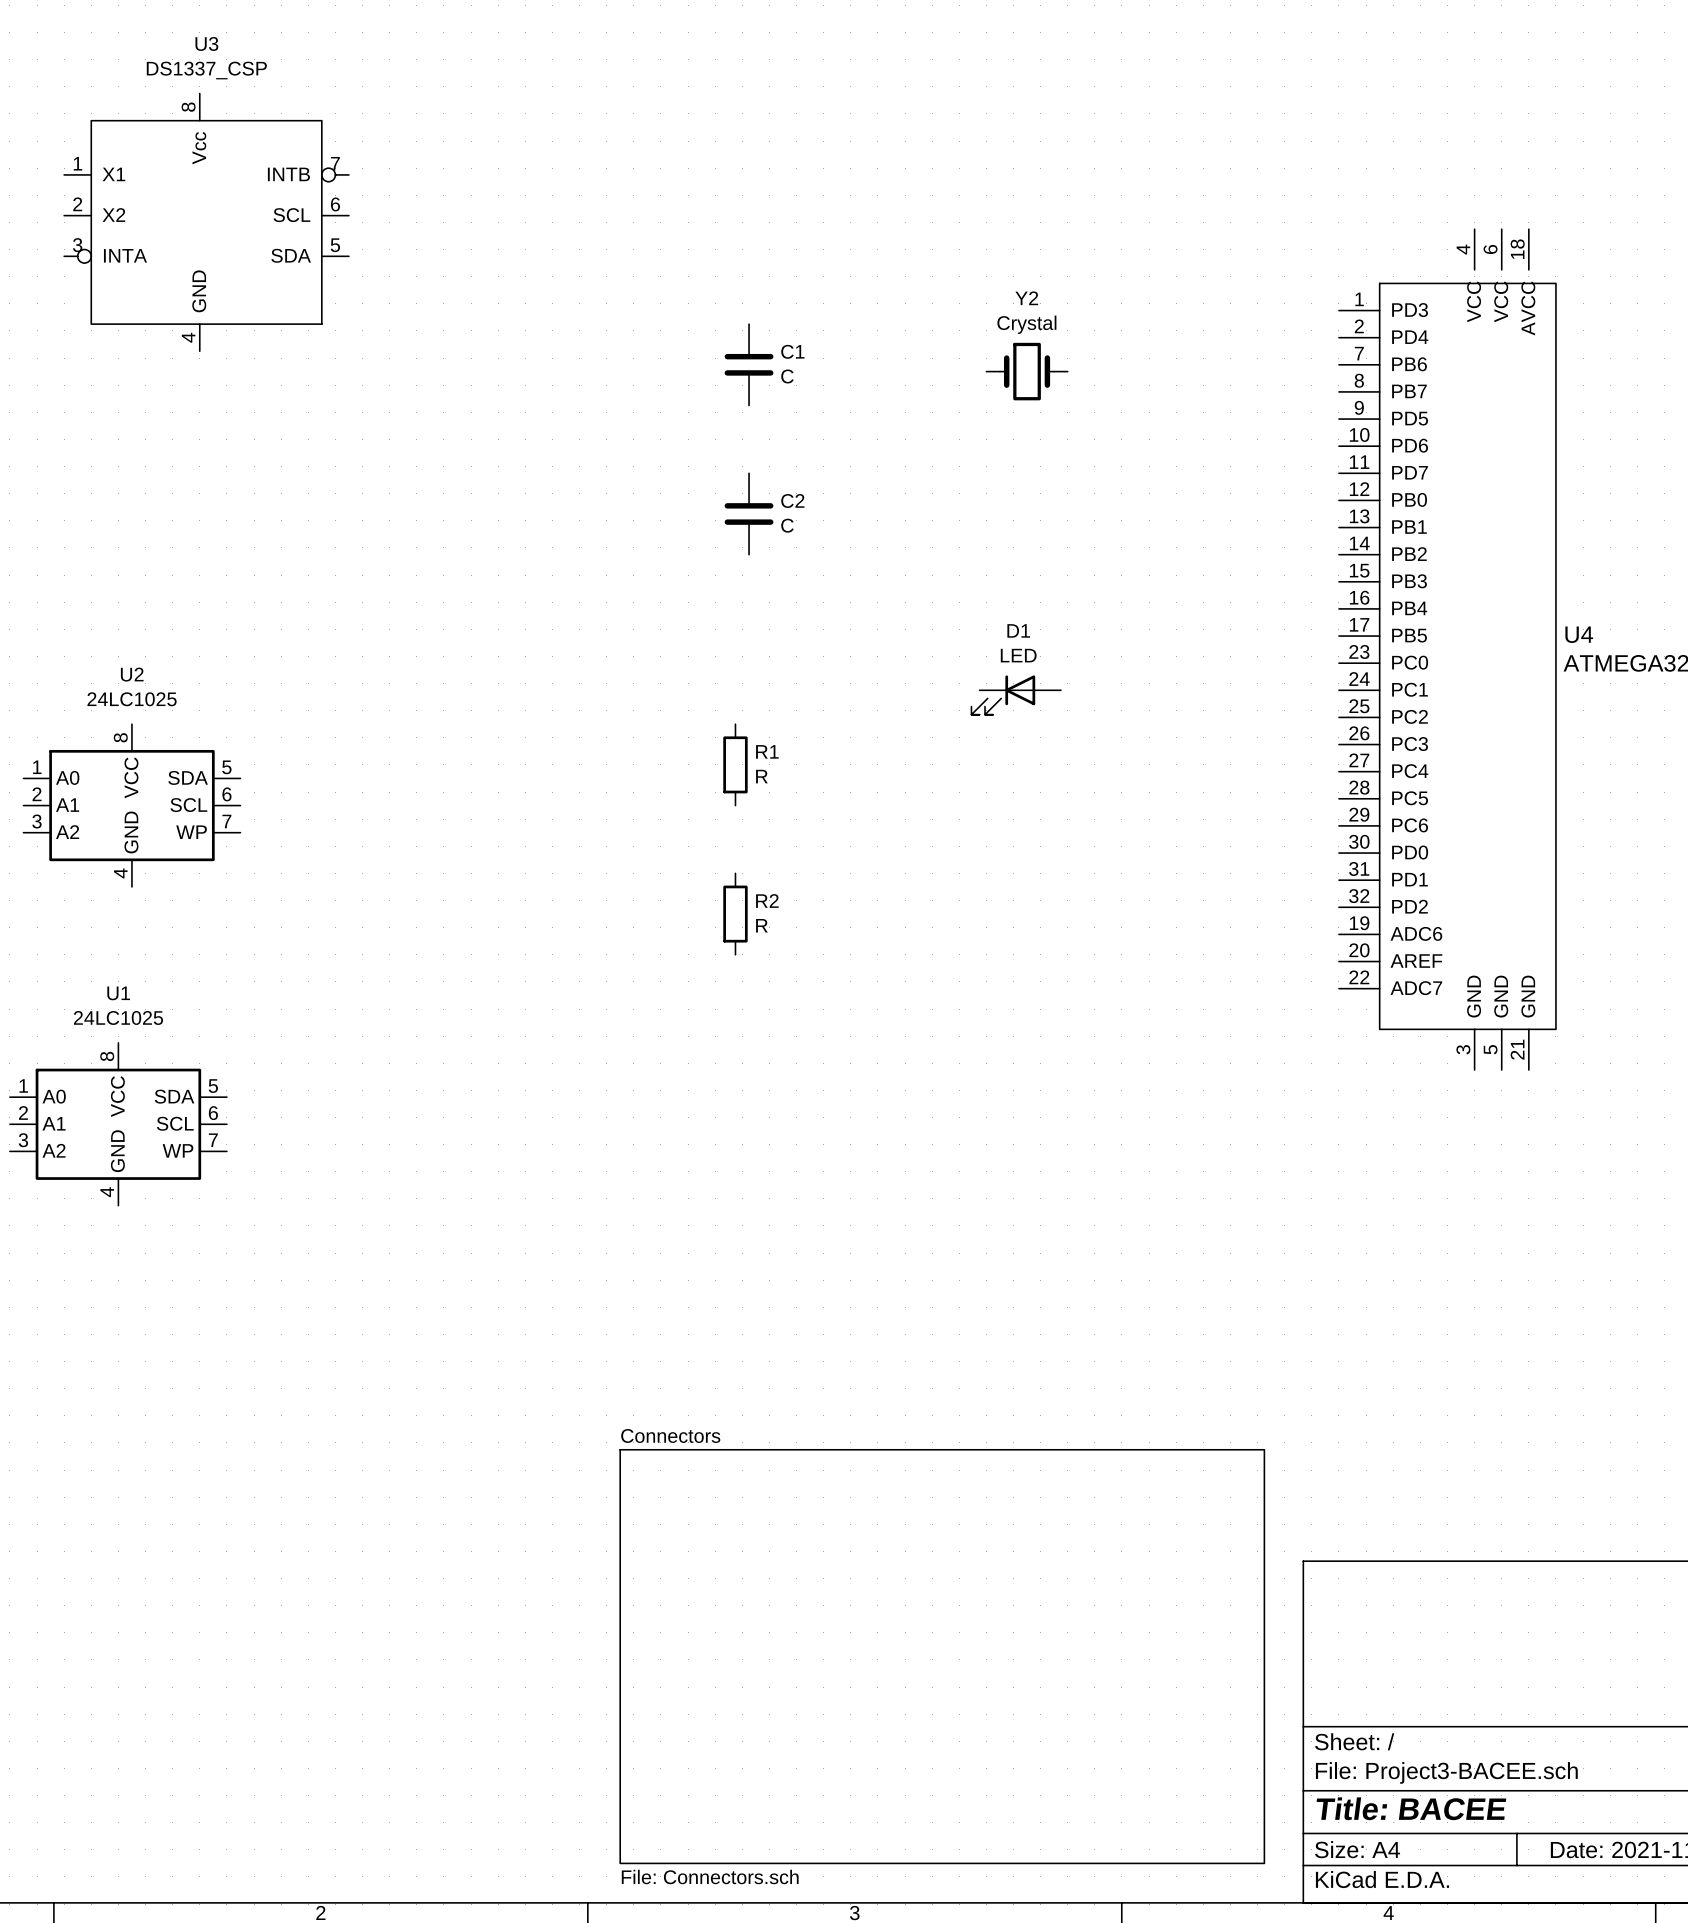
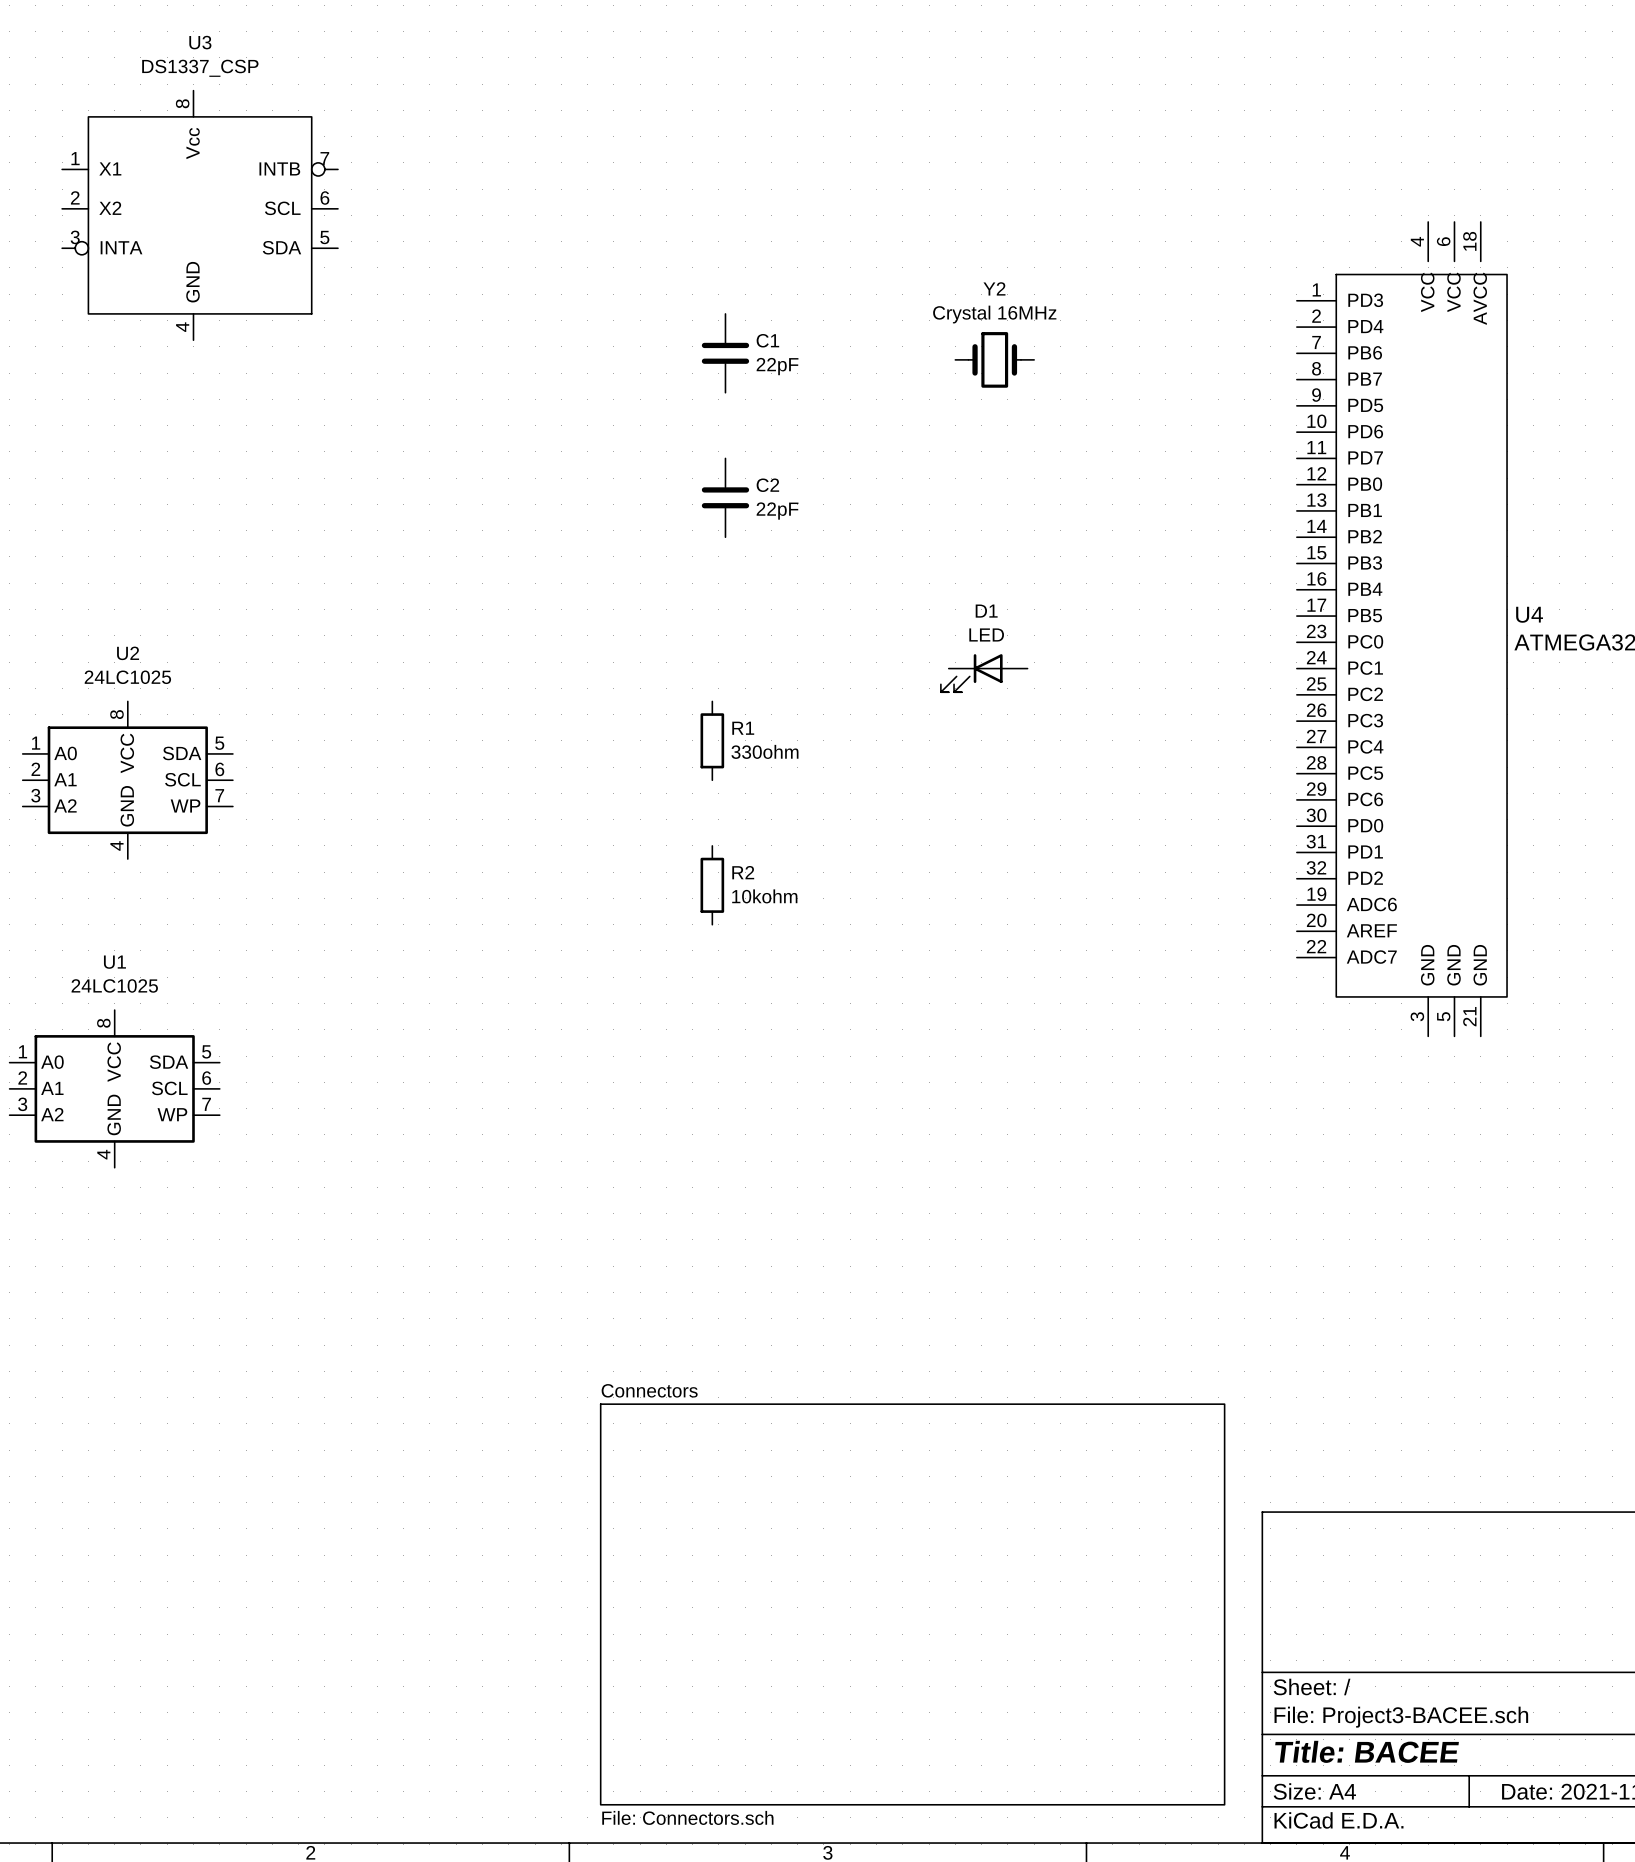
Y2 value: Crystal (1026, 324) -> Crystal 16MHz (994, 314)
C1 value: C (787, 376) -> 22pF (777, 366)
C2 value: C (787, 525) -> 22pF (777, 511)
R1 value: R (761, 776) -> 330ohm (764, 751)
R2 value: R (761, 925) -> 10kohm (764, 896)

